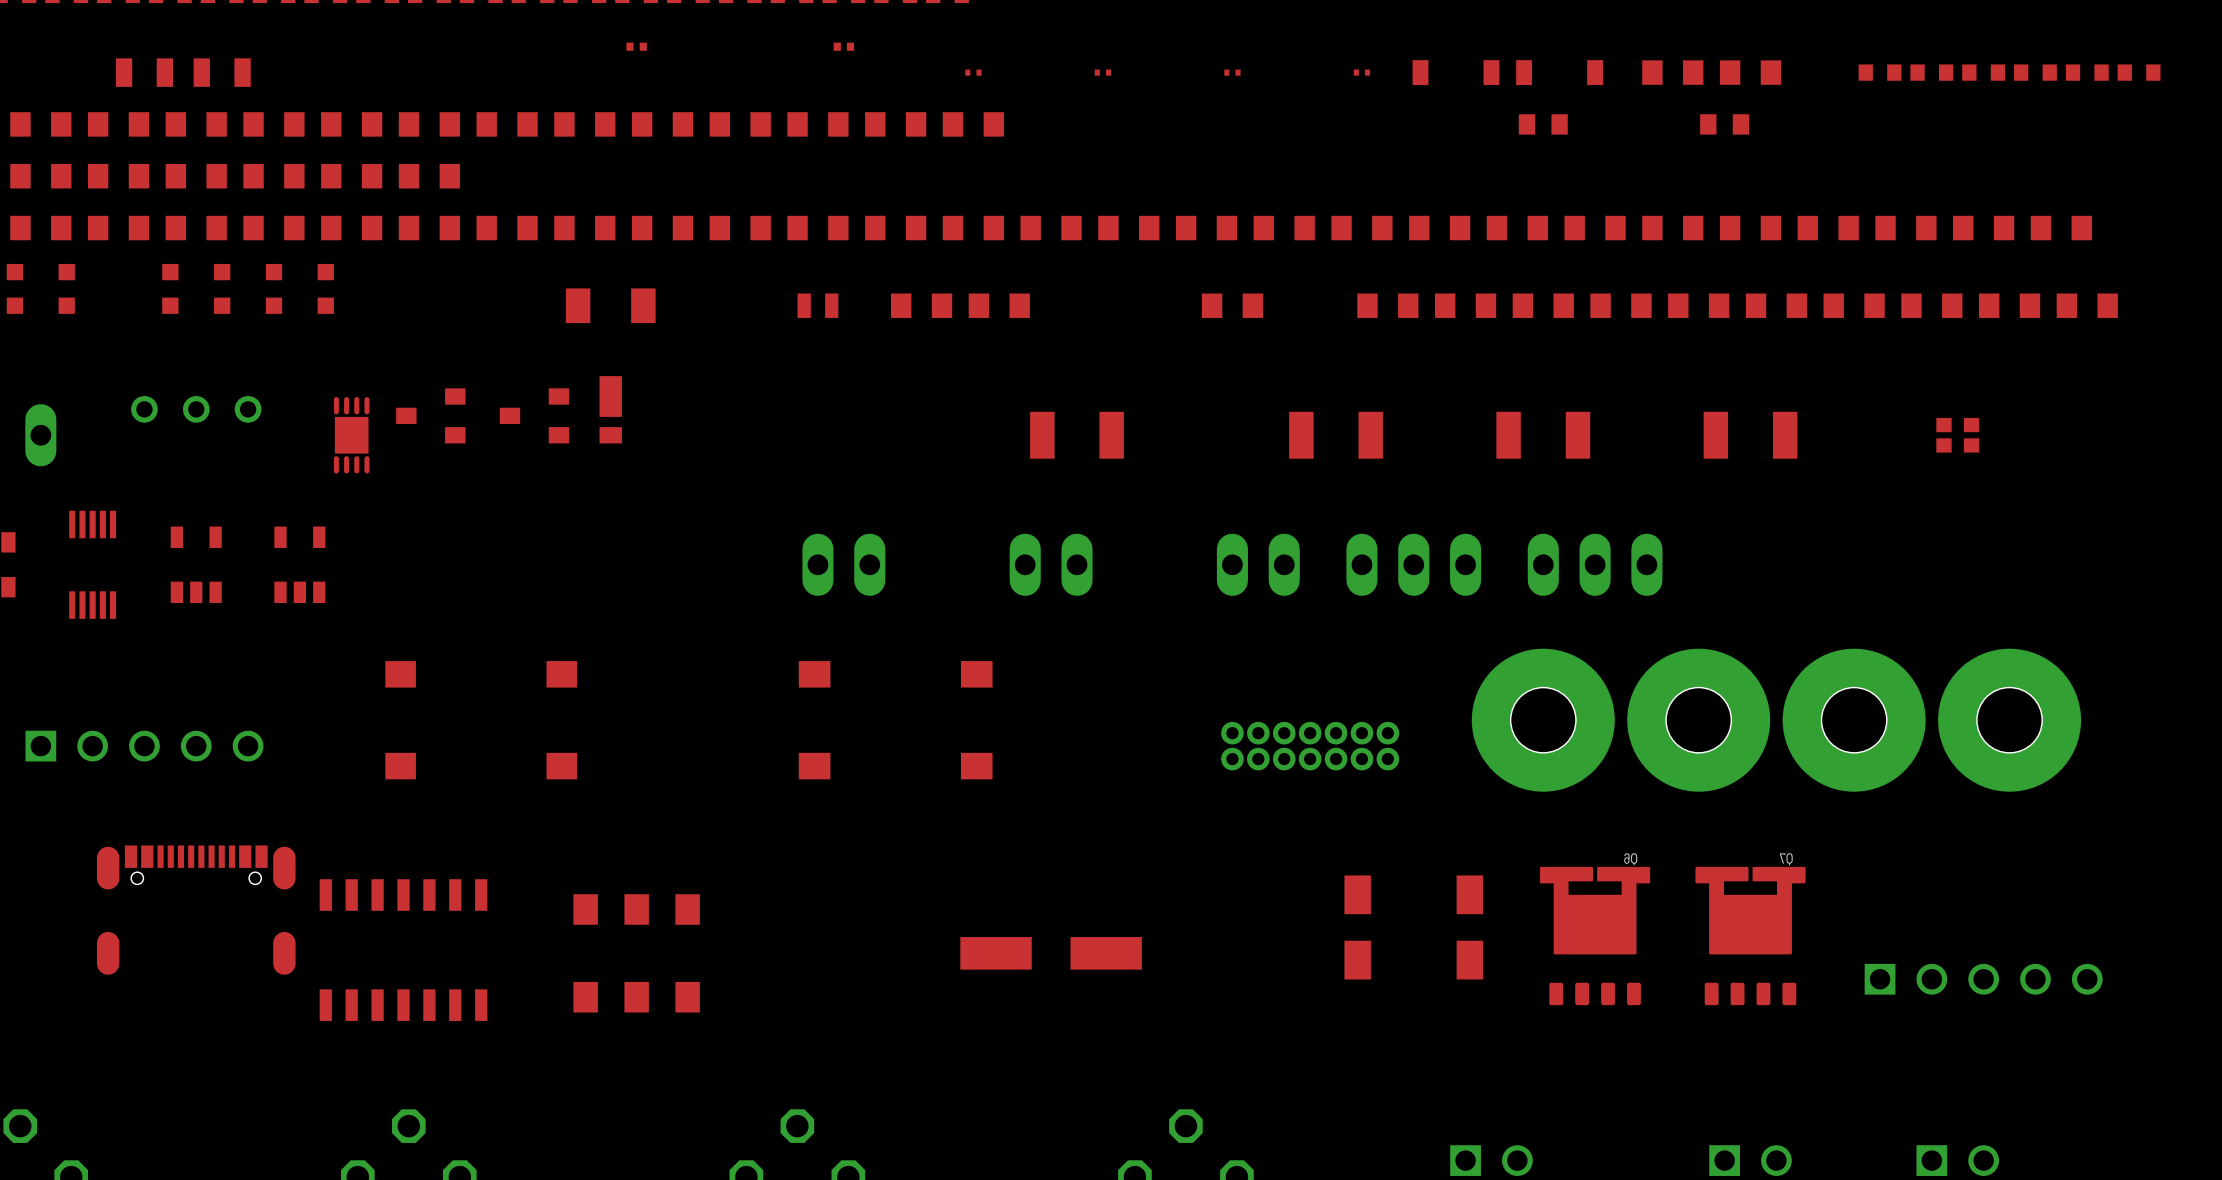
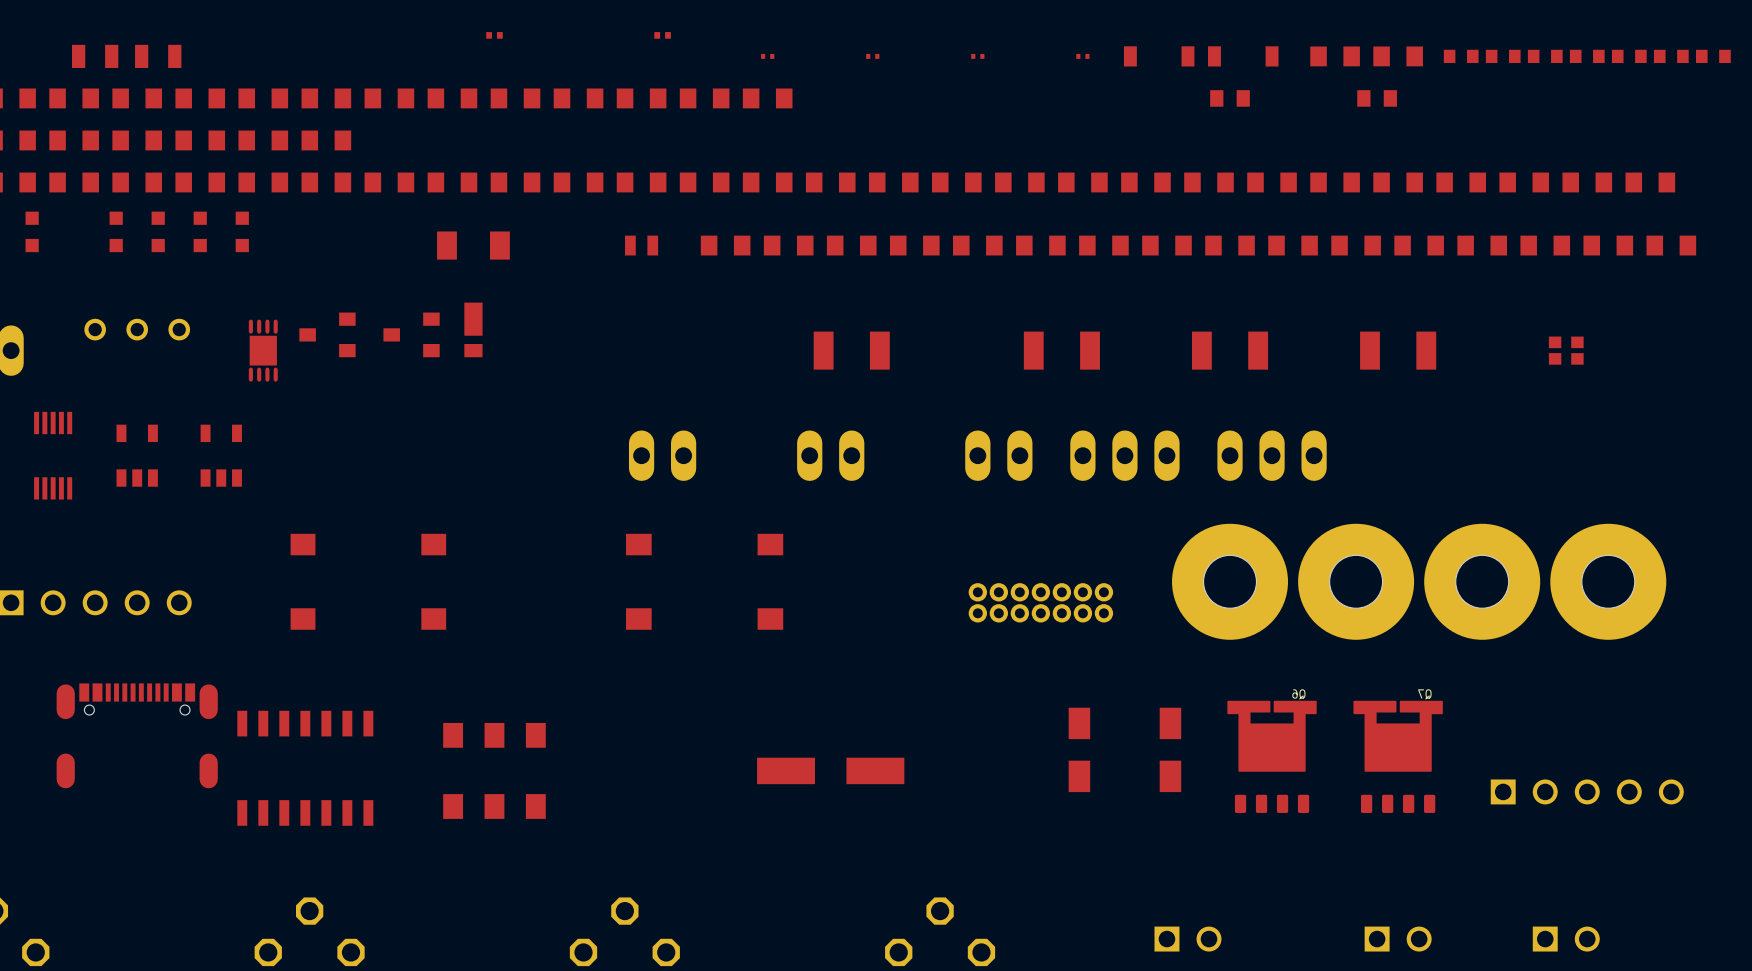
part: none -> (1461, 56)
part: none -> (851, 245)
part: none -> (914, 245)
part: none -> (1040, 245)

